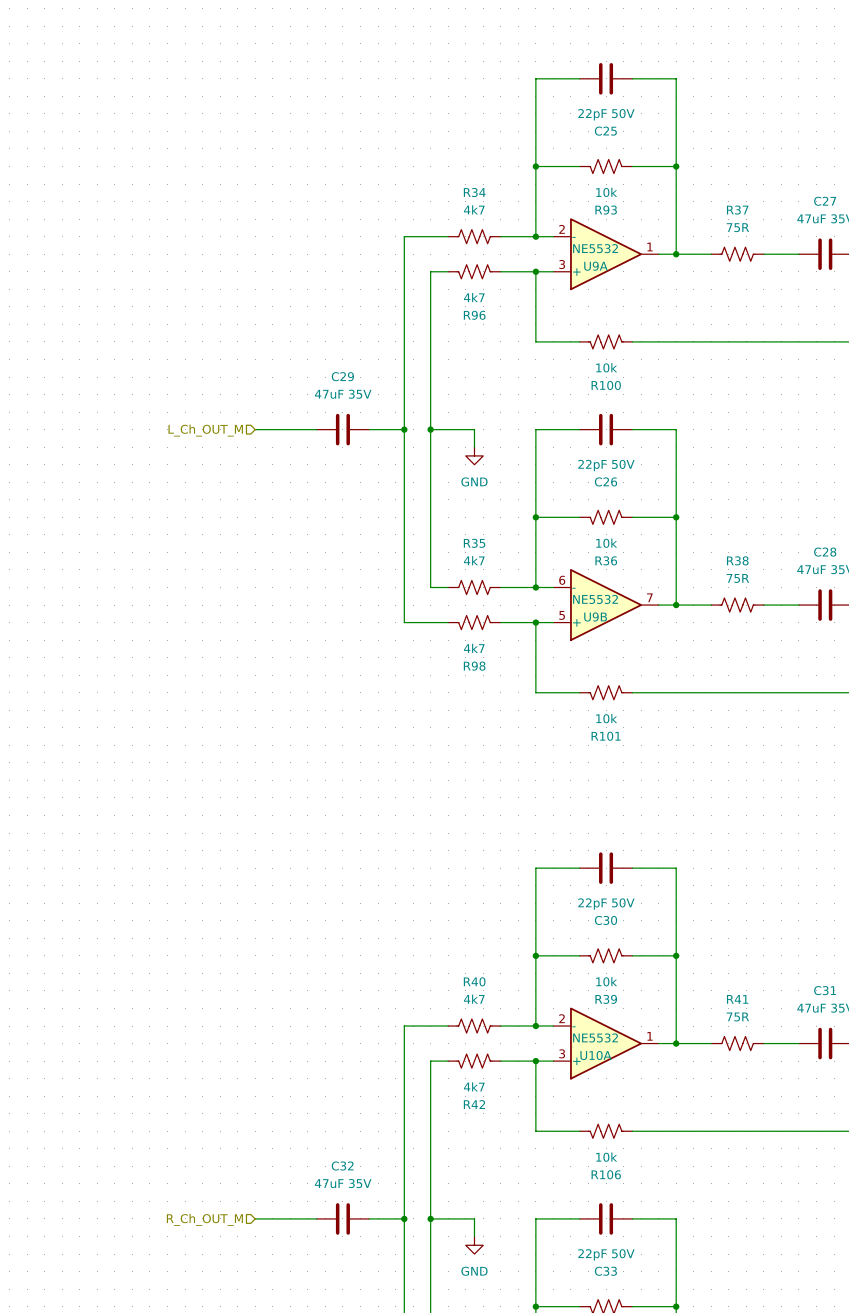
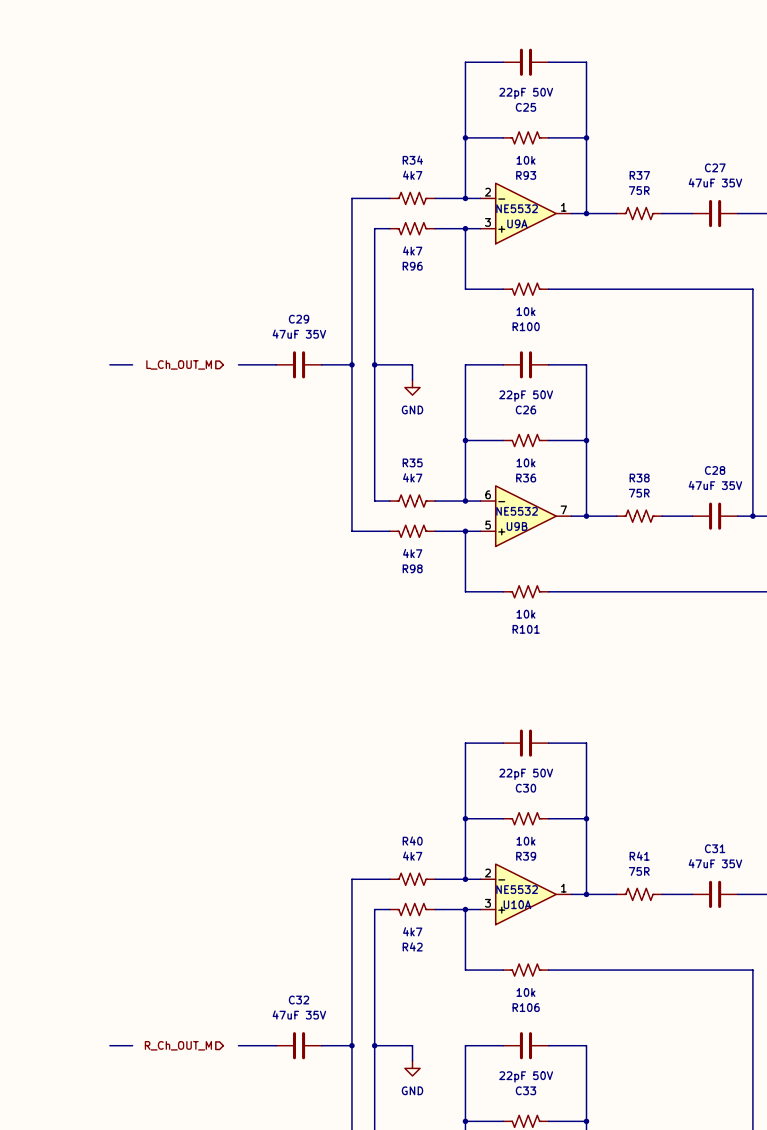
wire: none -> (109, 364) (132, 364)
wire: (255, 429) (272, 429) -> none
wire: none -> (109, 1045) (132, 1045)
wire: (255, 1218) (272, 1218) -> none

